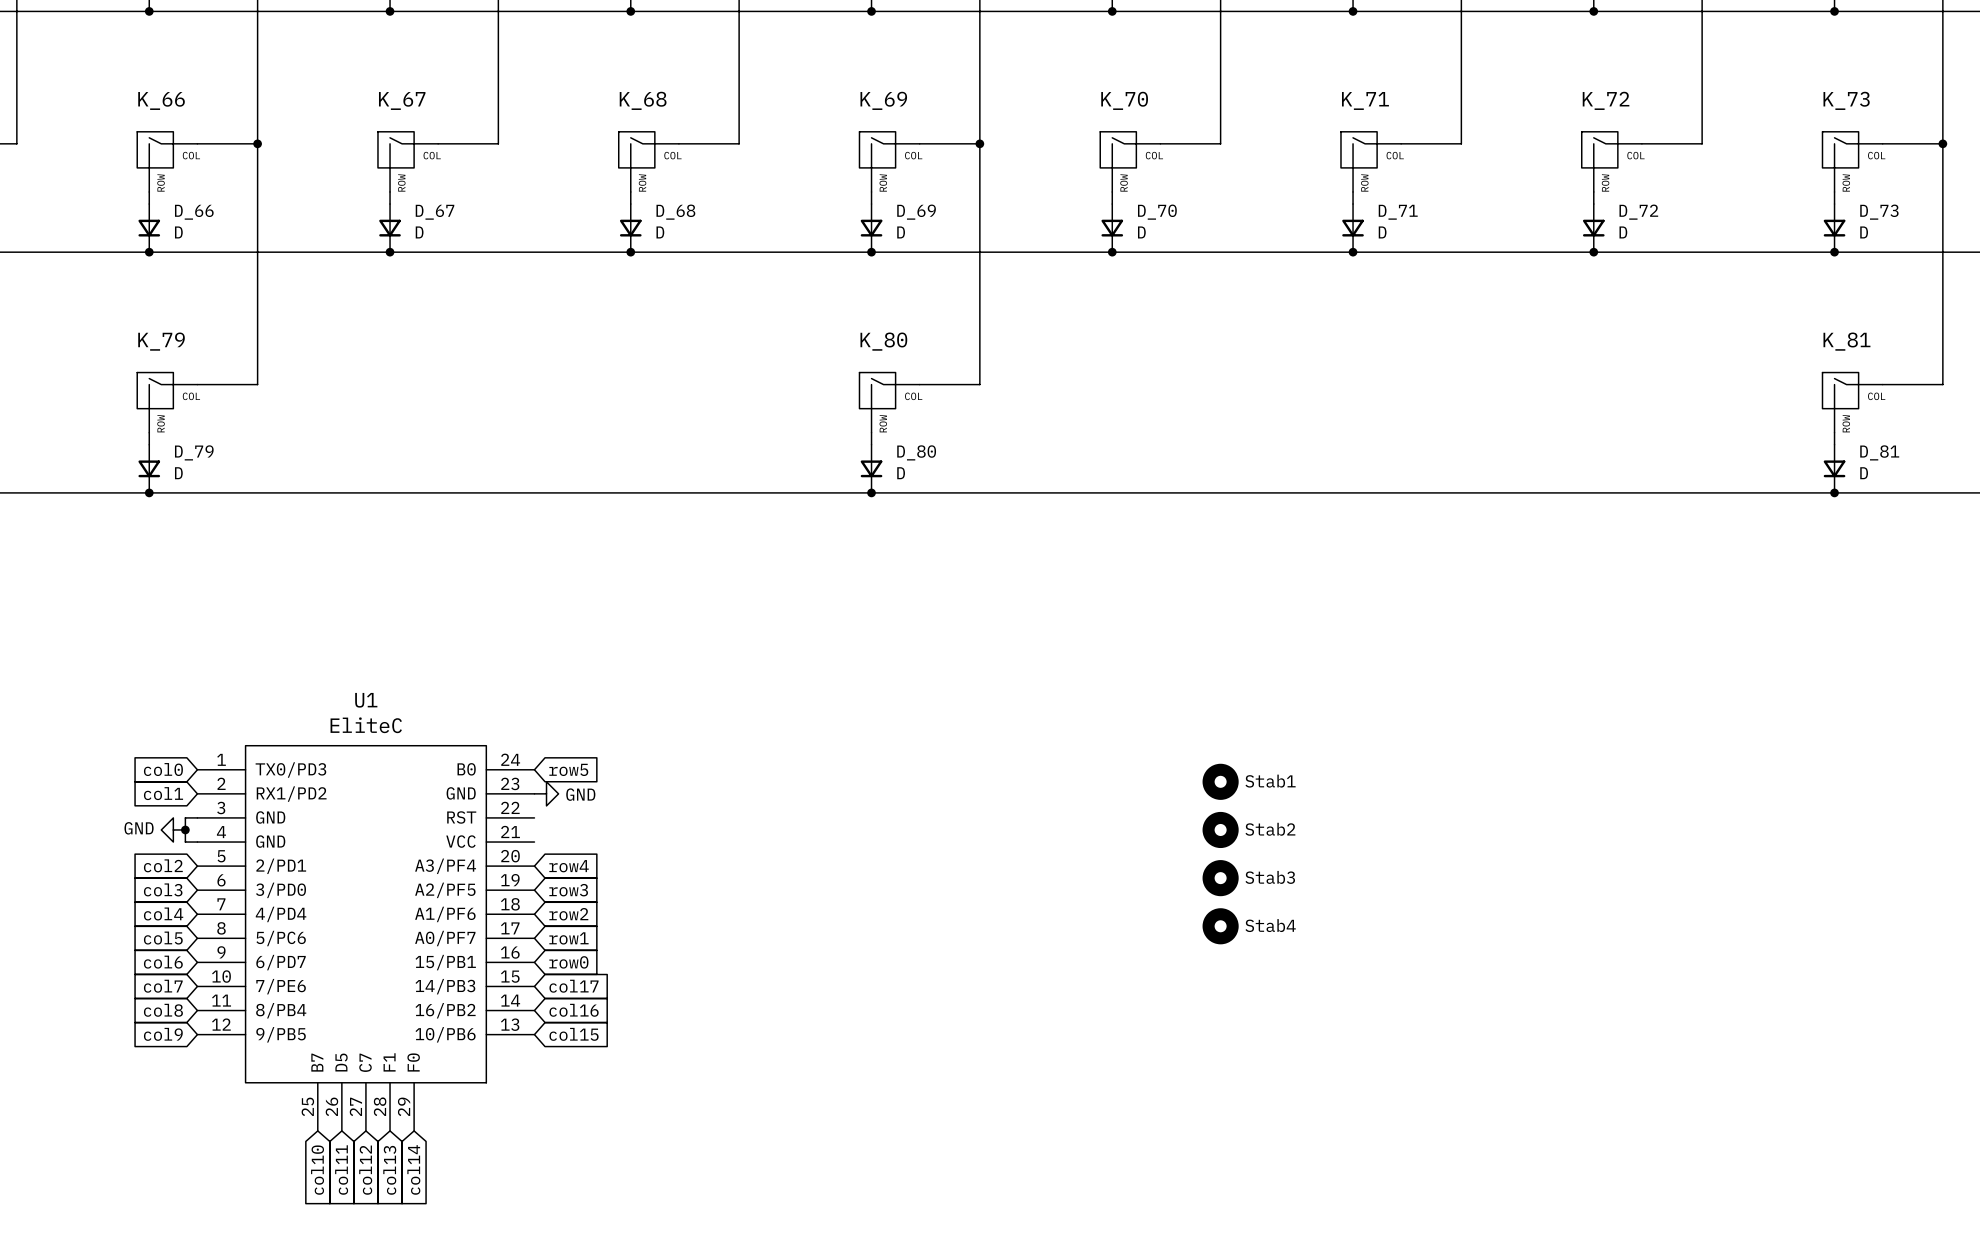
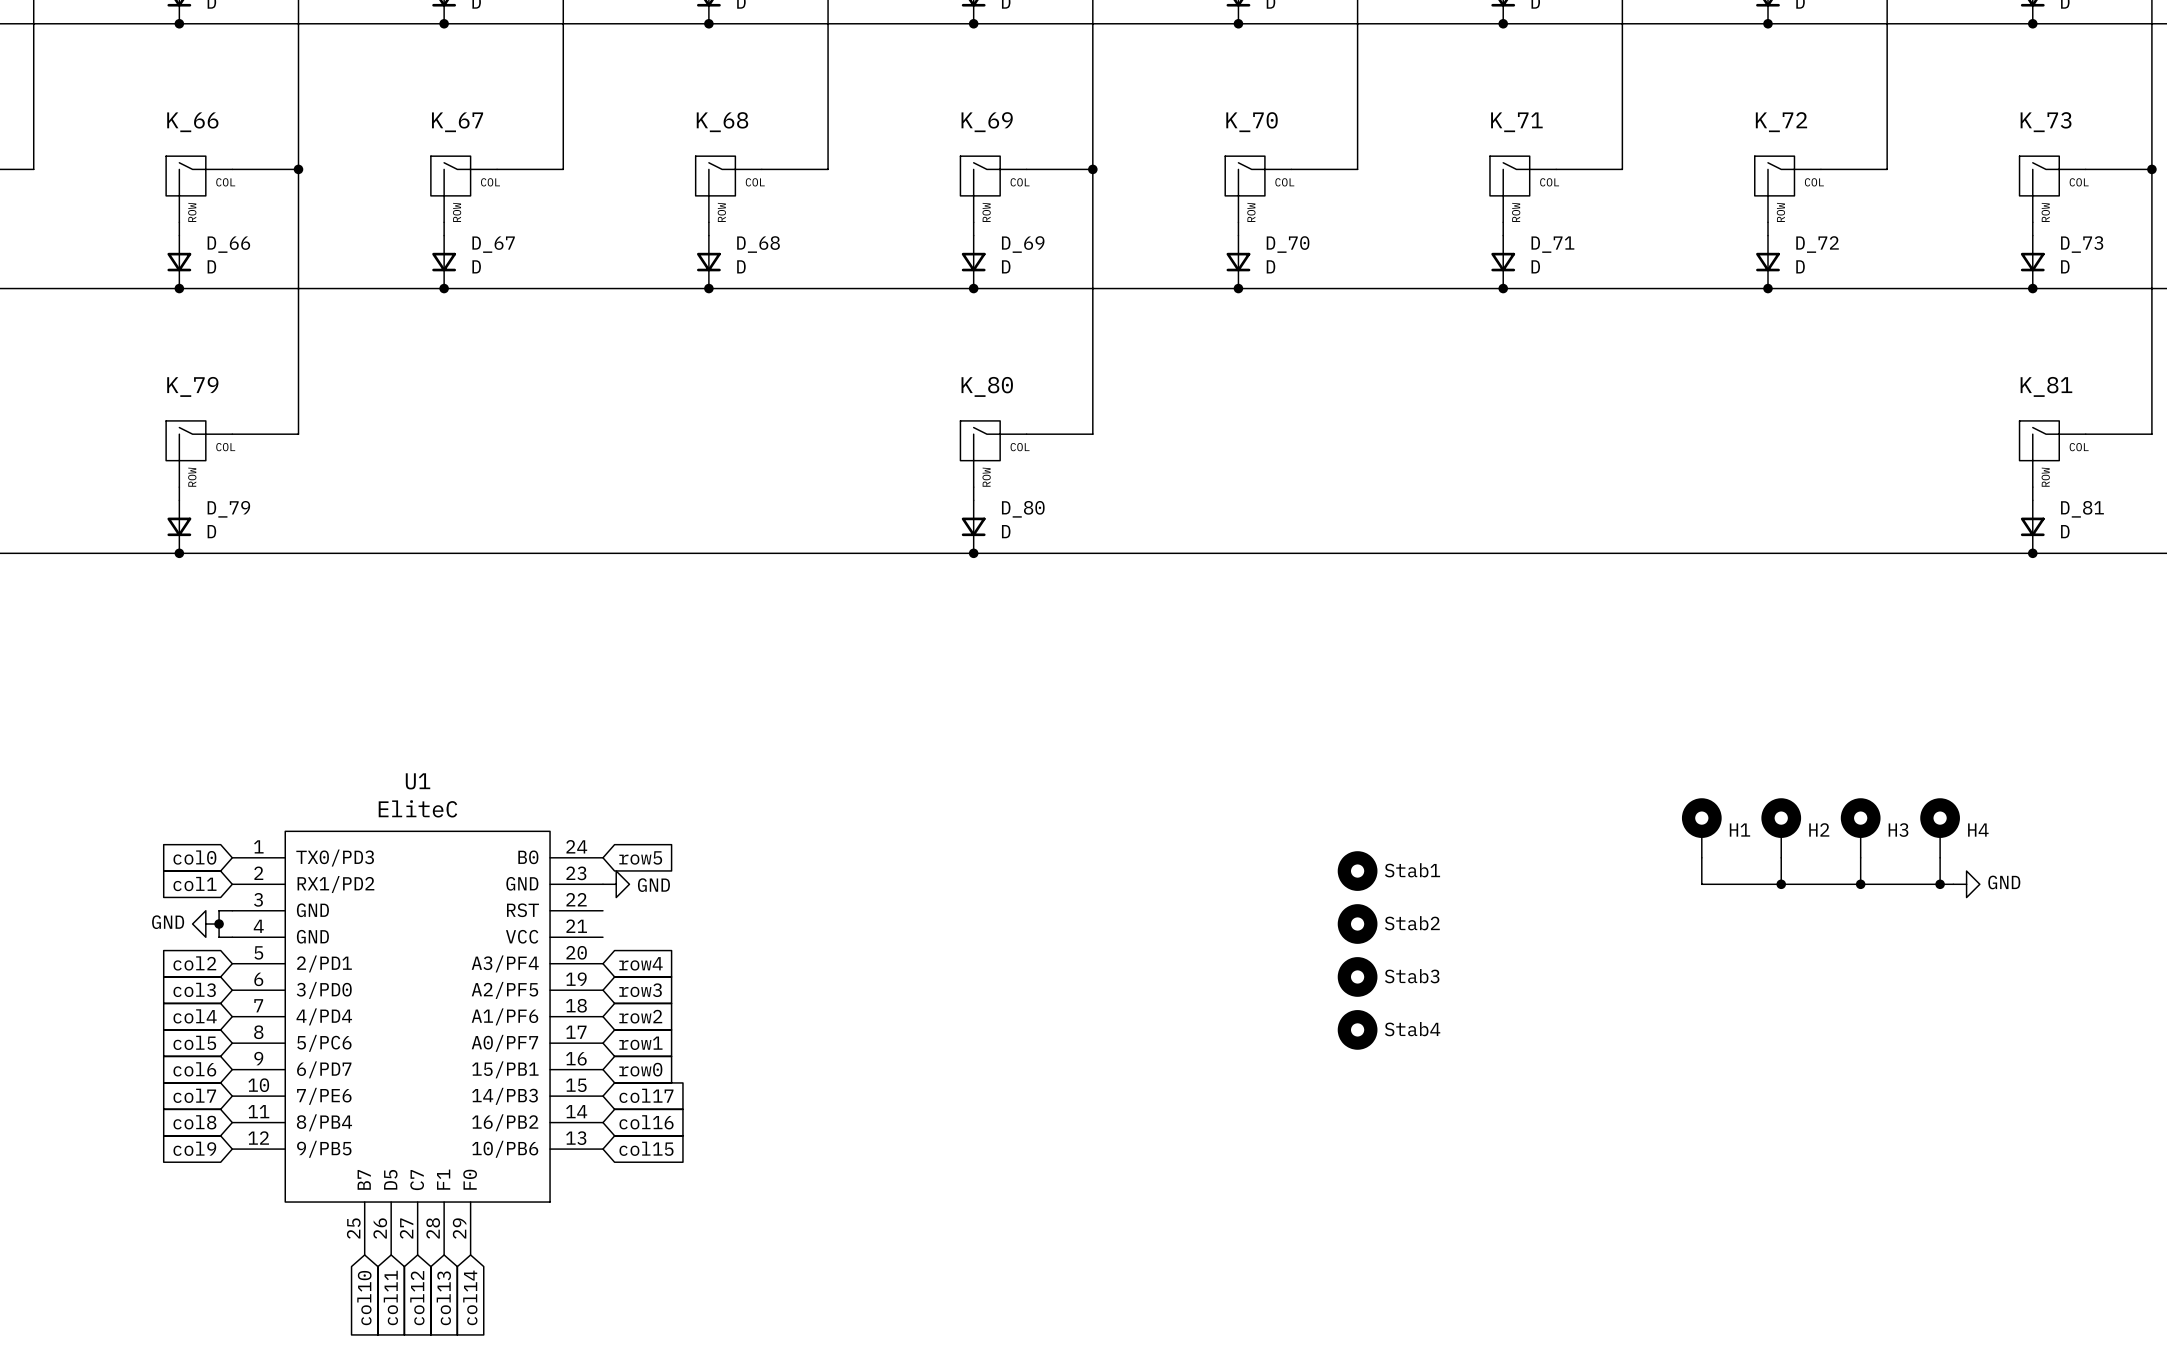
H1: none -> (1701, 828)
H2: none -> (1781, 828)
H3: none -> (1860, 828)
H4: none -> (1940, 828)
wire: none -> (1701, 857) (1701, 884) (1953, 884)
wire: none -> (1781, 857) (1781, 884)
wire: none -> (1860, 857) (1860, 884)
wire: none -> (1940, 857) (1940, 884)
junction: none -> (1781, 884)
junction: none -> (1860, 884)
junction: none -> (1940, 884)
power symbol: none -> GND (1966, 884)

